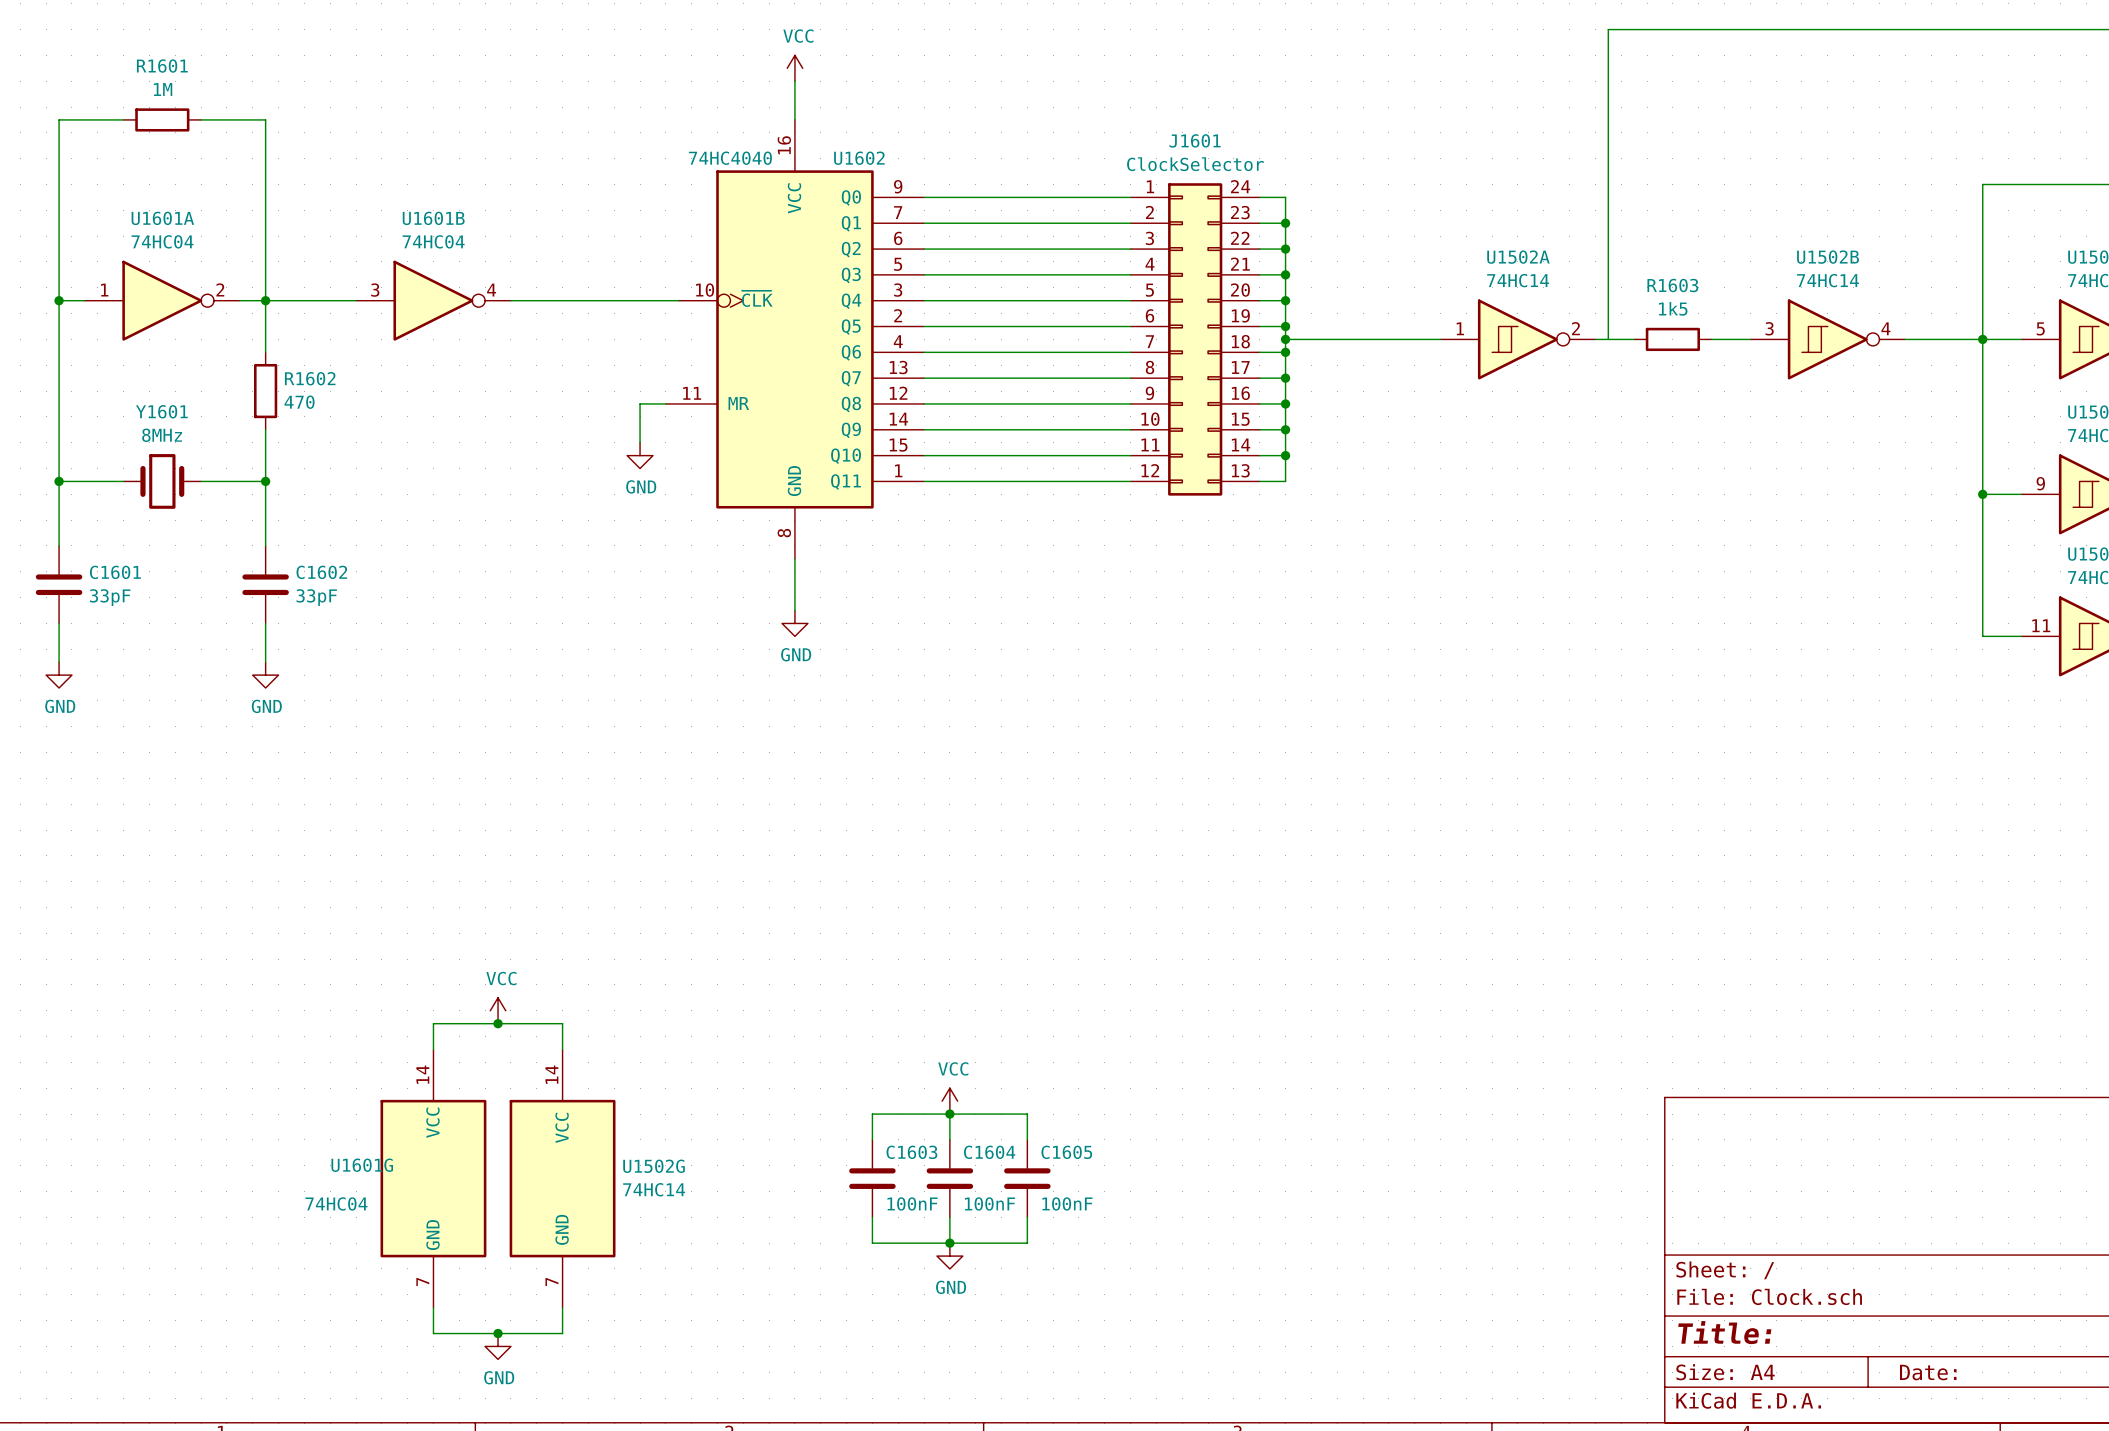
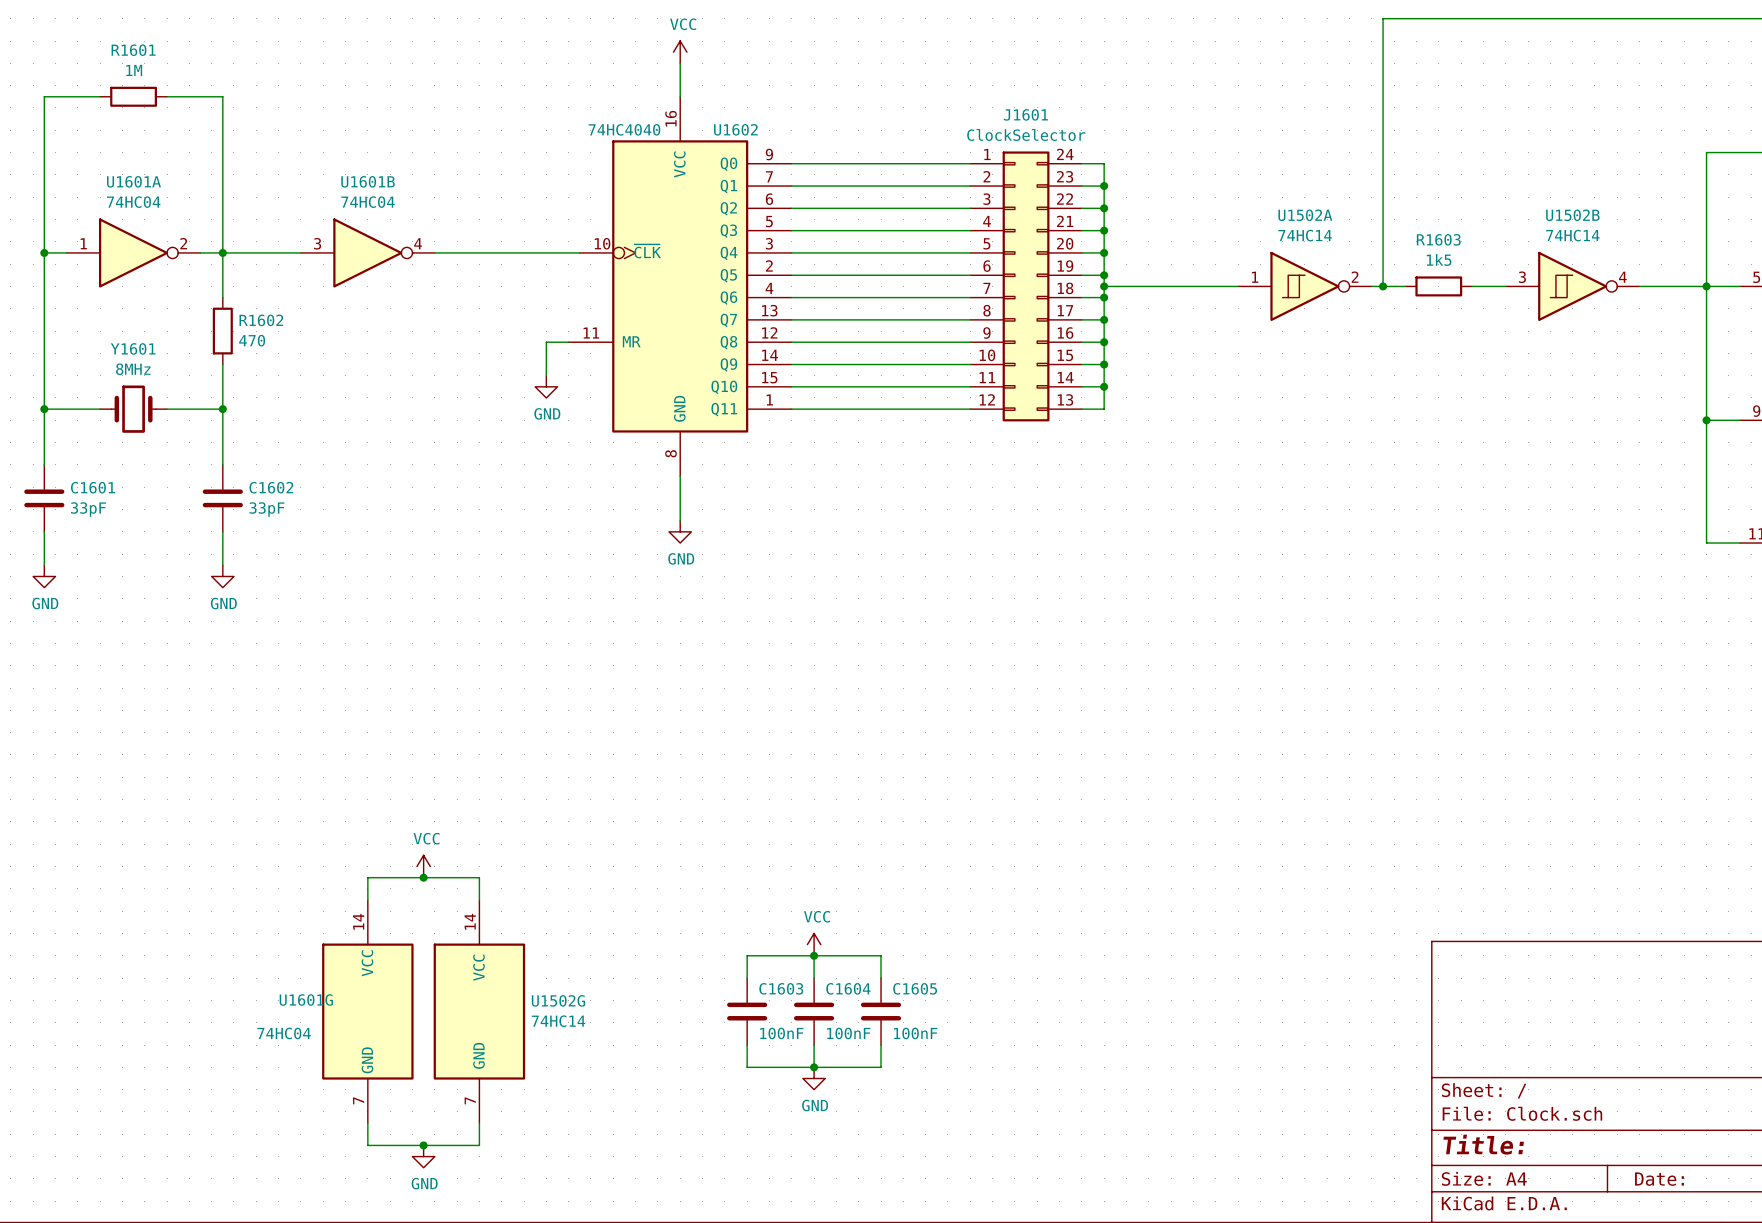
junction: none -> (1383, 286)

